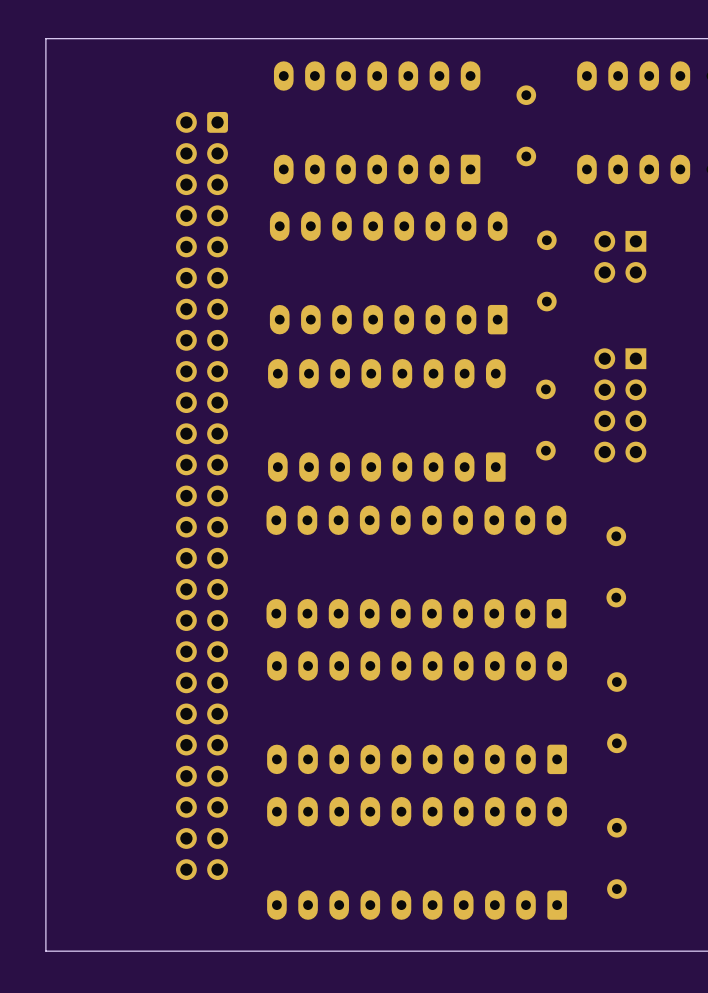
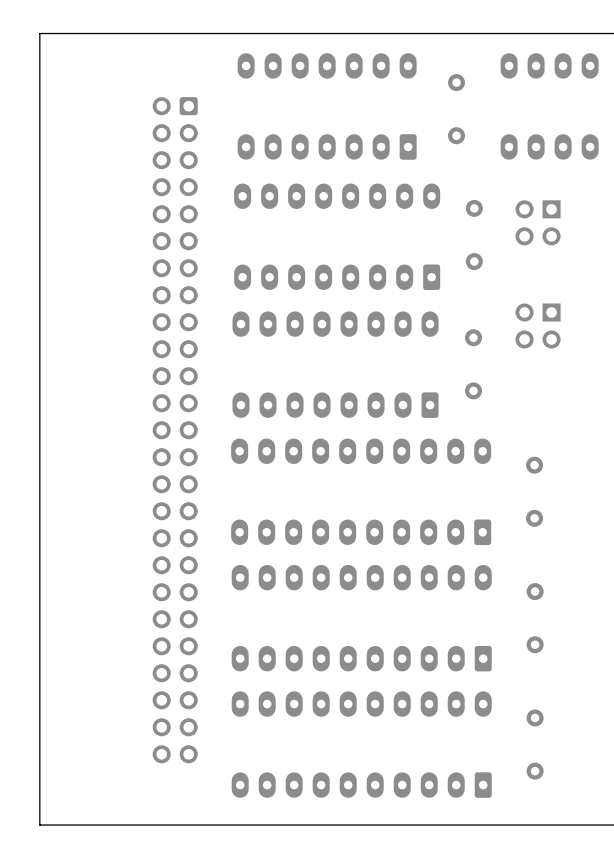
part: none -> (538, 325)
part: (620, 405) -> none

